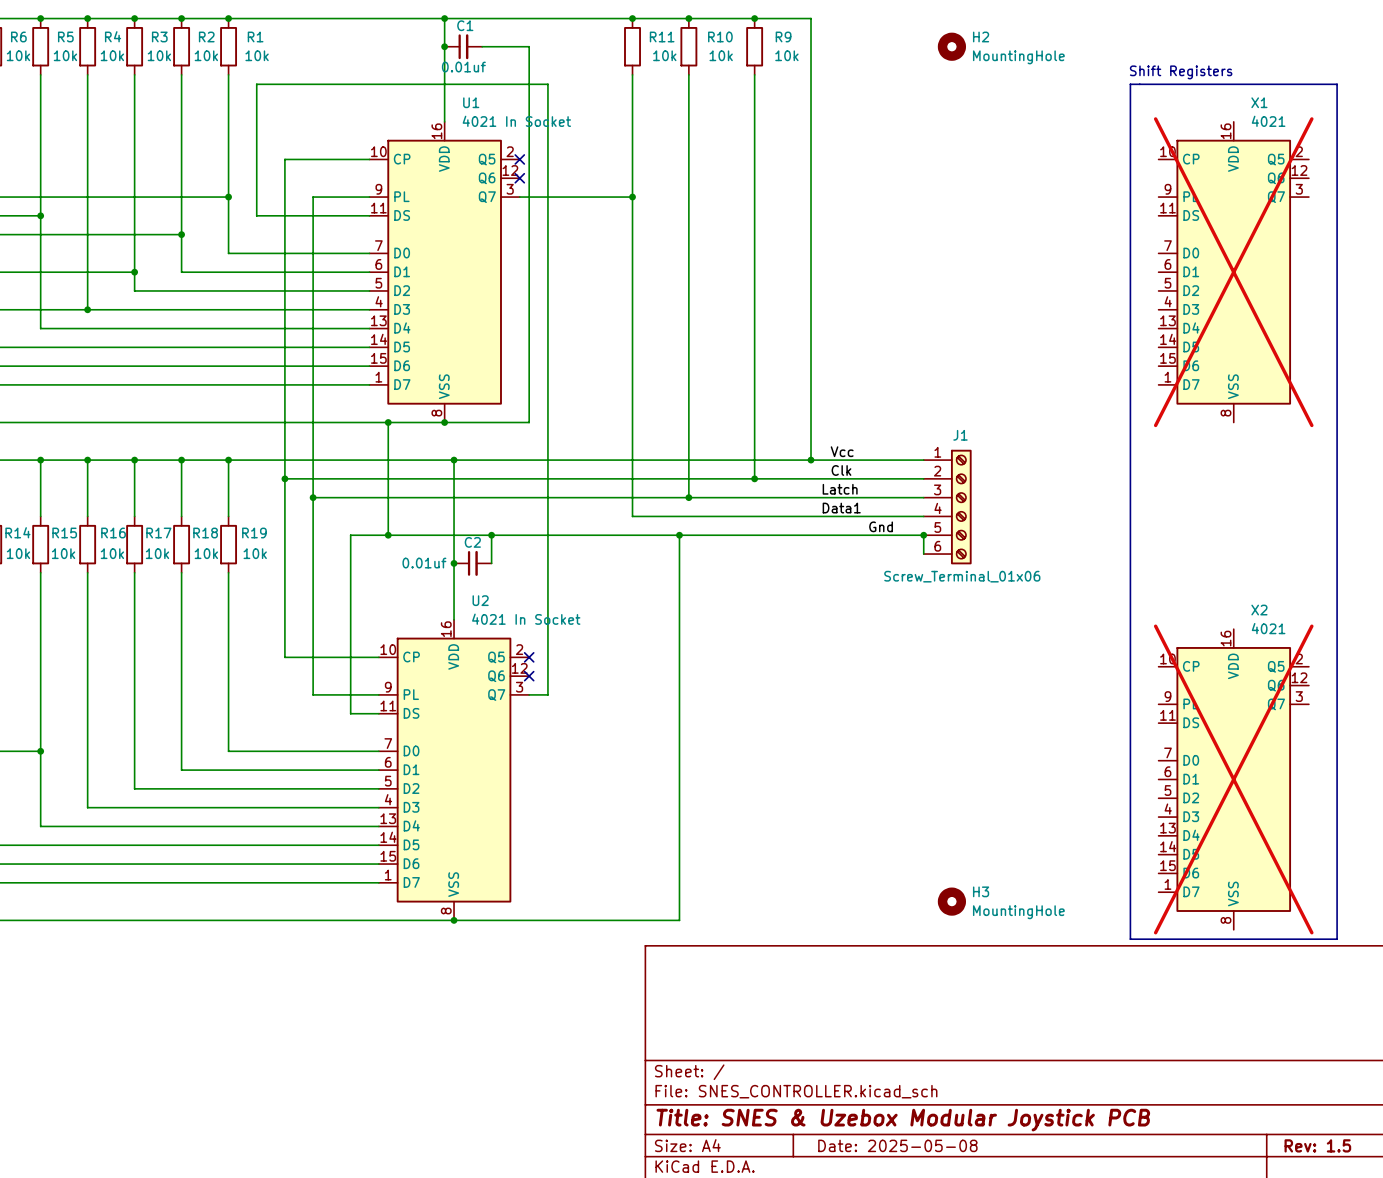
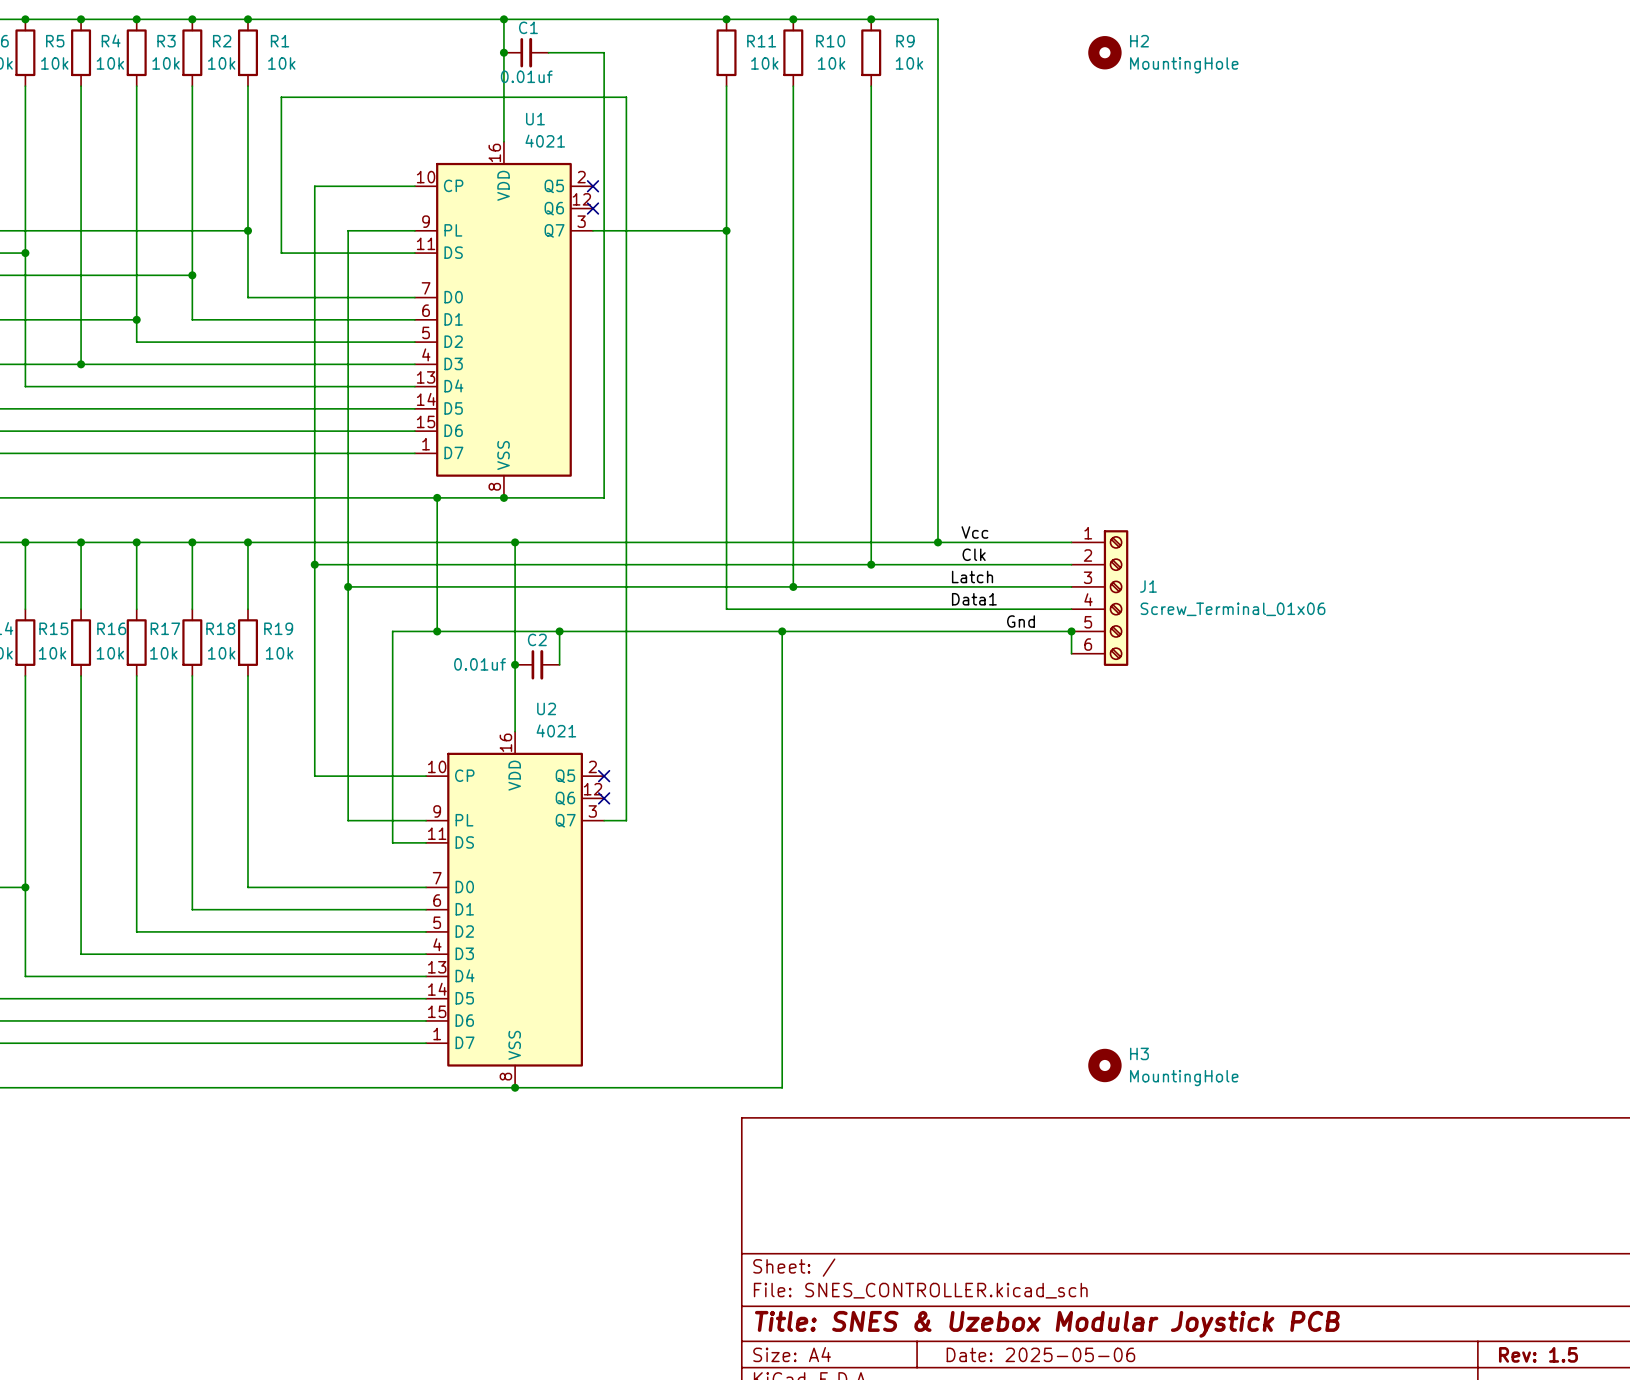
text: Shift Registers (1181, 72) -> none
line: (1130, 84) (1130, 939) (1337, 939) (1337, 84) (1130, 84) -> none
U1 value: 4021 In Socket (516, 121) -> 4021 (545, 141)
X1: 4021 (1233, 272) -> none
J1 name position: J1 (960, 435) -> J1 (1148, 586)
J1 value position: Screw_Terminal_01x06 (962, 576) -> Screw_Terminal_01x06 (1233, 609)
U2 value: 4021 In Socket (526, 619) -> 4021 (556, 730)
X2: 4021 (1233, 779) -> none
title block: Date: 2025-05-08 (897, 1145) -> Date: 2025-05-06 (1040, 1354)

